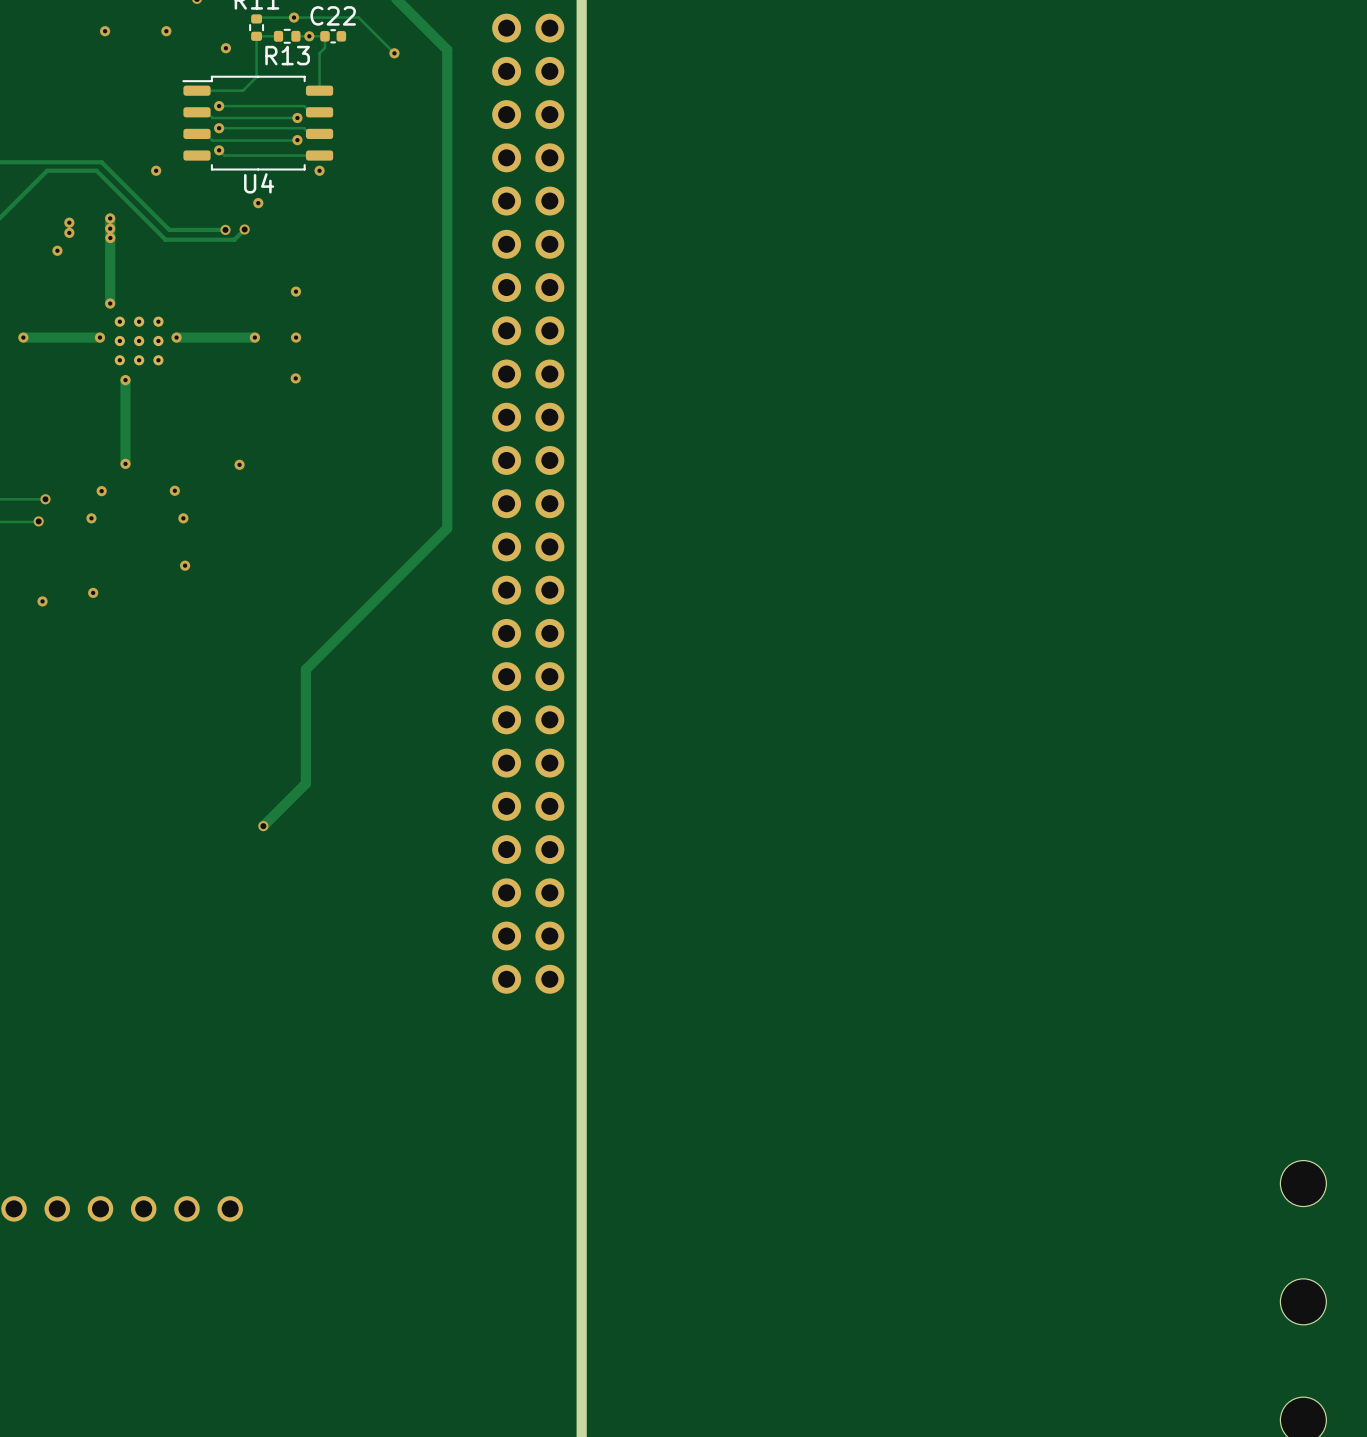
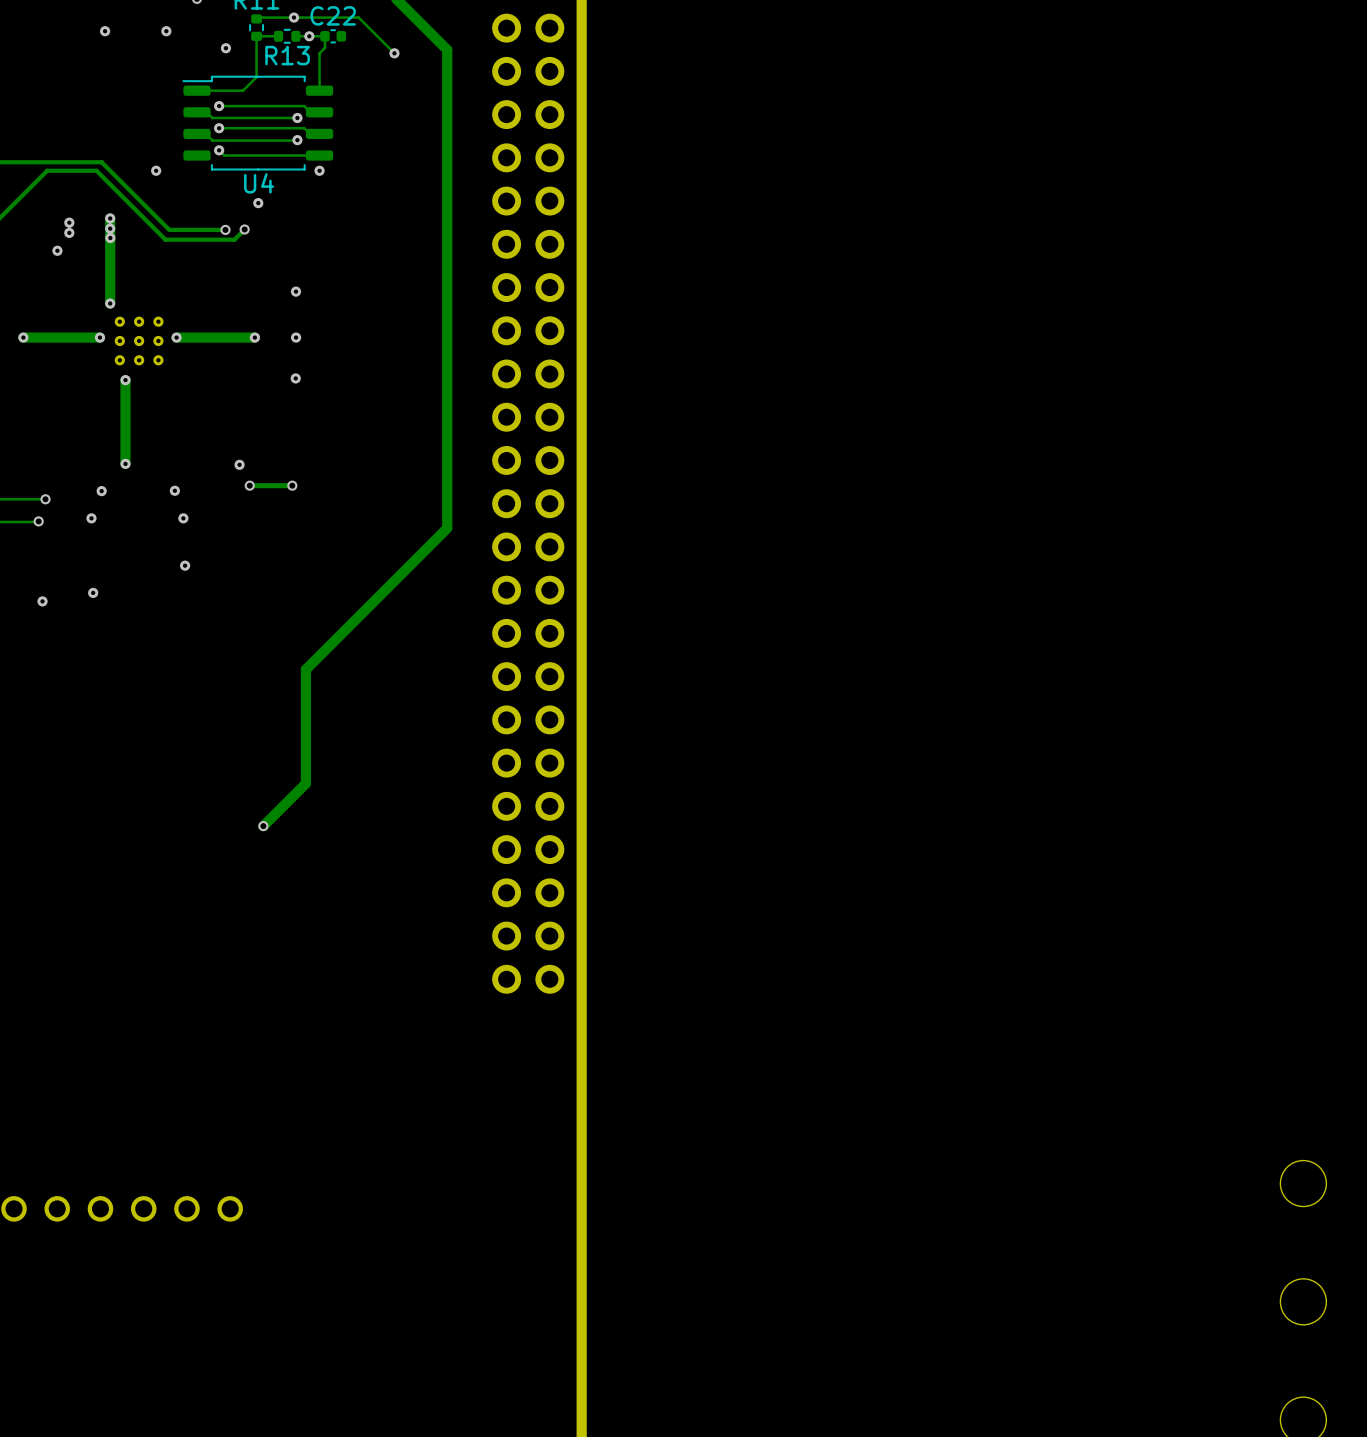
via: none -> (249, 485)
track: none -> (292, 485) (249, 485)
via: none -> (292, 485)

